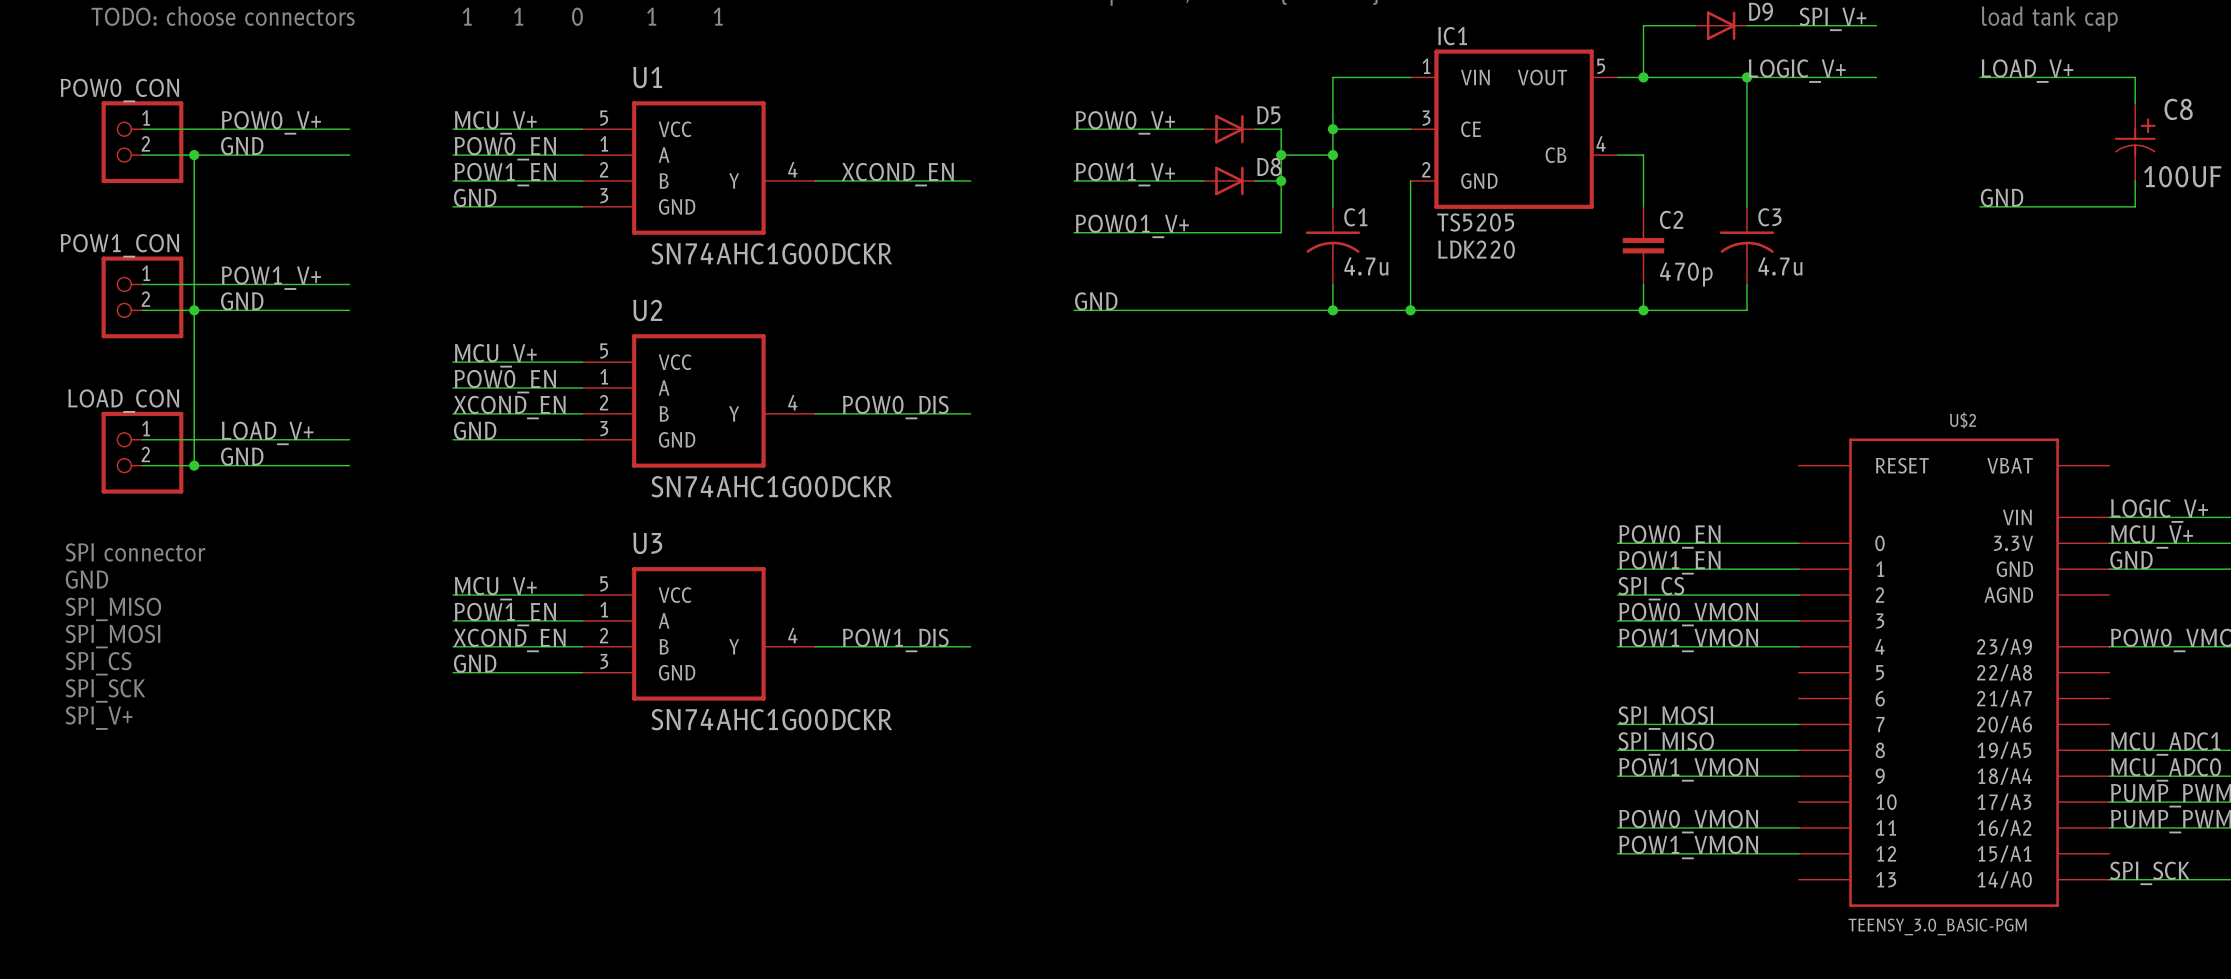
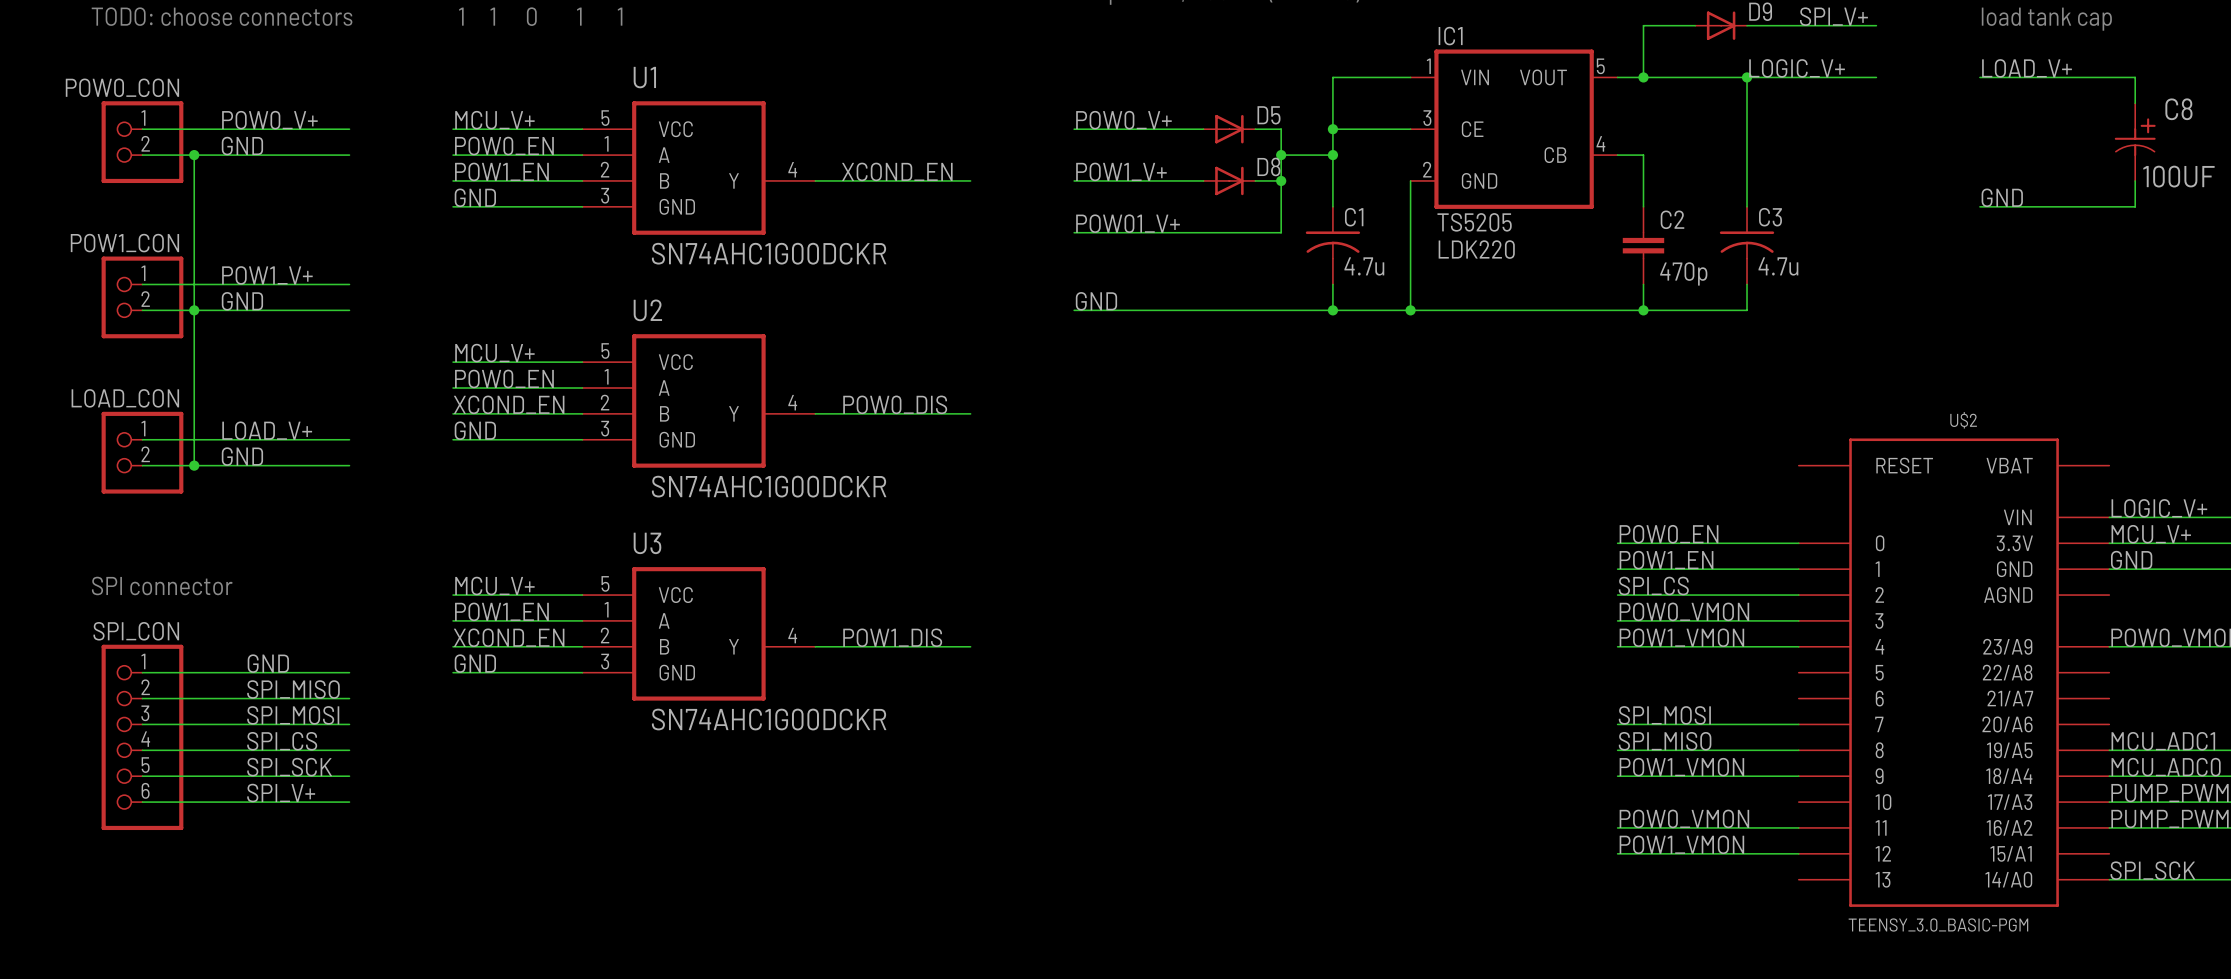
text position: SPI connector (135, 552) -> SPI connector (162, 585)
text: GND (86, 579) -> none
text: SPI_MISO (113, 609) -> none
text: SPI_MOSI (113, 636) -> none
text: SPI_CS (98, 663) -> none
label: none -> GND (268, 663)
wire: none -> (142, 672) (349, 672)
text: SPI_SCK (105, 690) -> none
label: none -> SPI_MISO (293, 689)
wire: none -> (142, 698) (349, 698)
text: SPI_V+ (99, 718) -> none
label: none -> SPI_MOSI (293, 715)
wire: none -> (142, 724) (349, 724)
SPI_CON: none -> (142, 737)
label: none -> SPI_CS (282, 741)
wire: none -> (142, 750) (349, 750)
label: none -> SPI_SCK (289, 767)
wire: none -> (142, 776) (349, 776)
label: none -> SPI_V+ (281, 793)
wire: none -> (142, 802) (349, 802)

